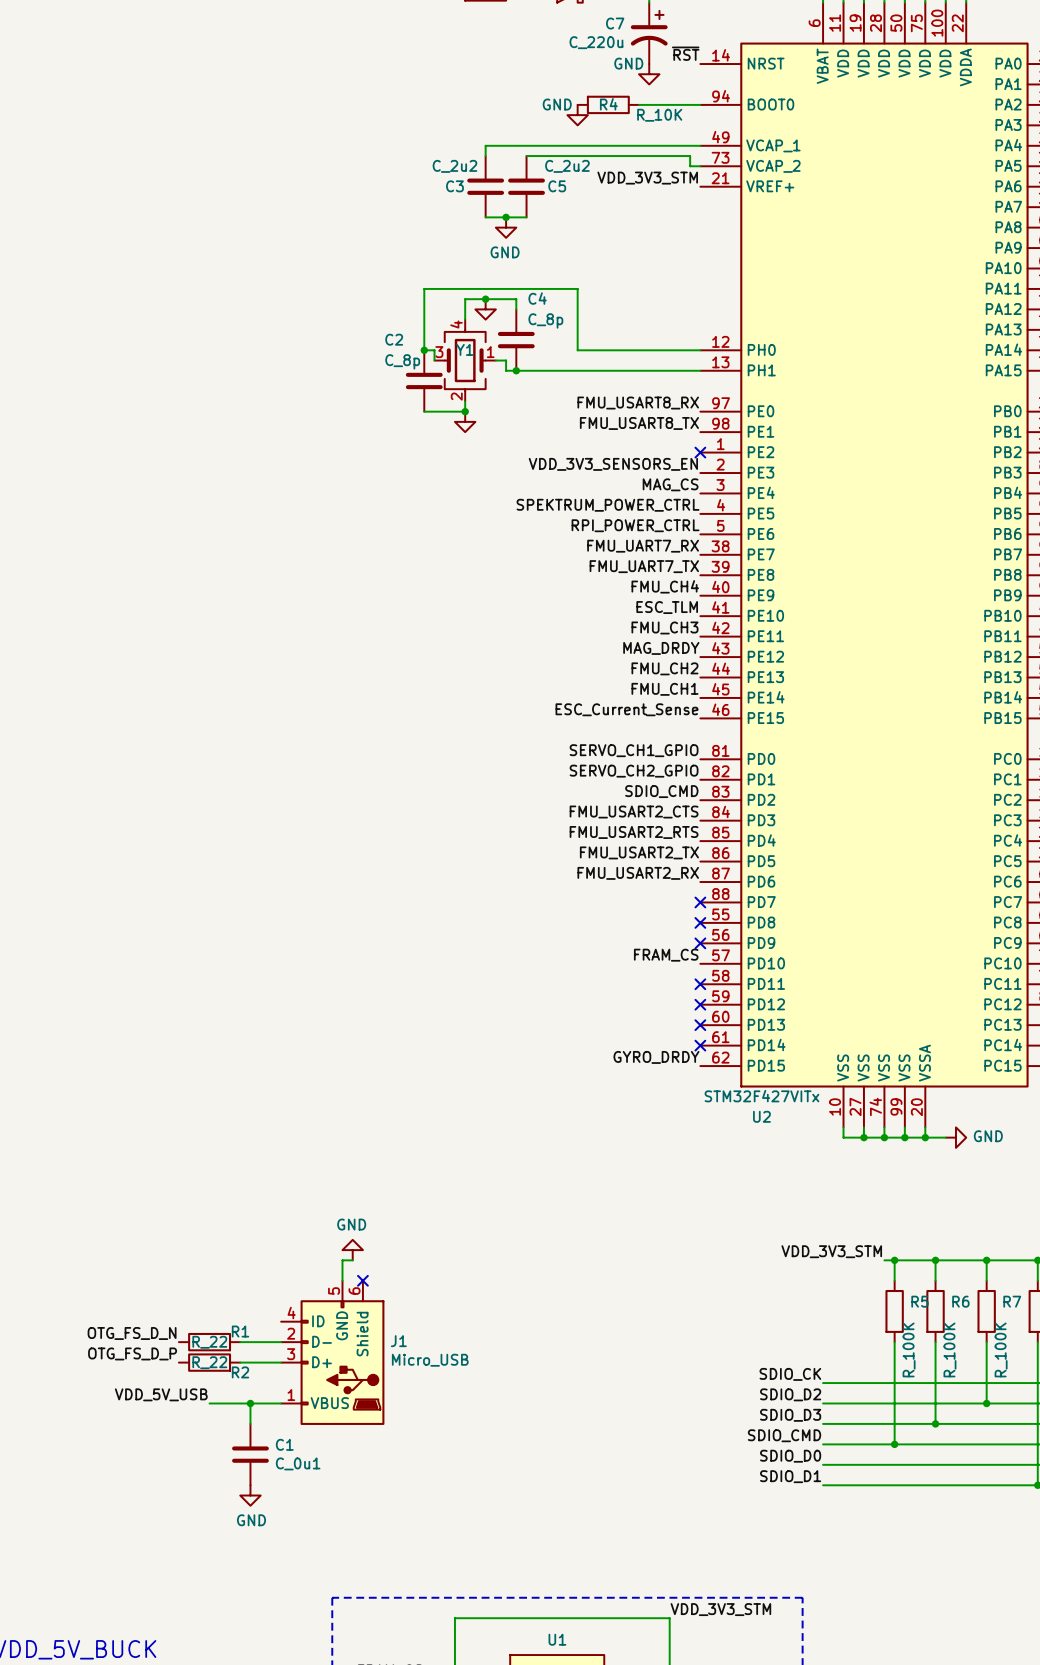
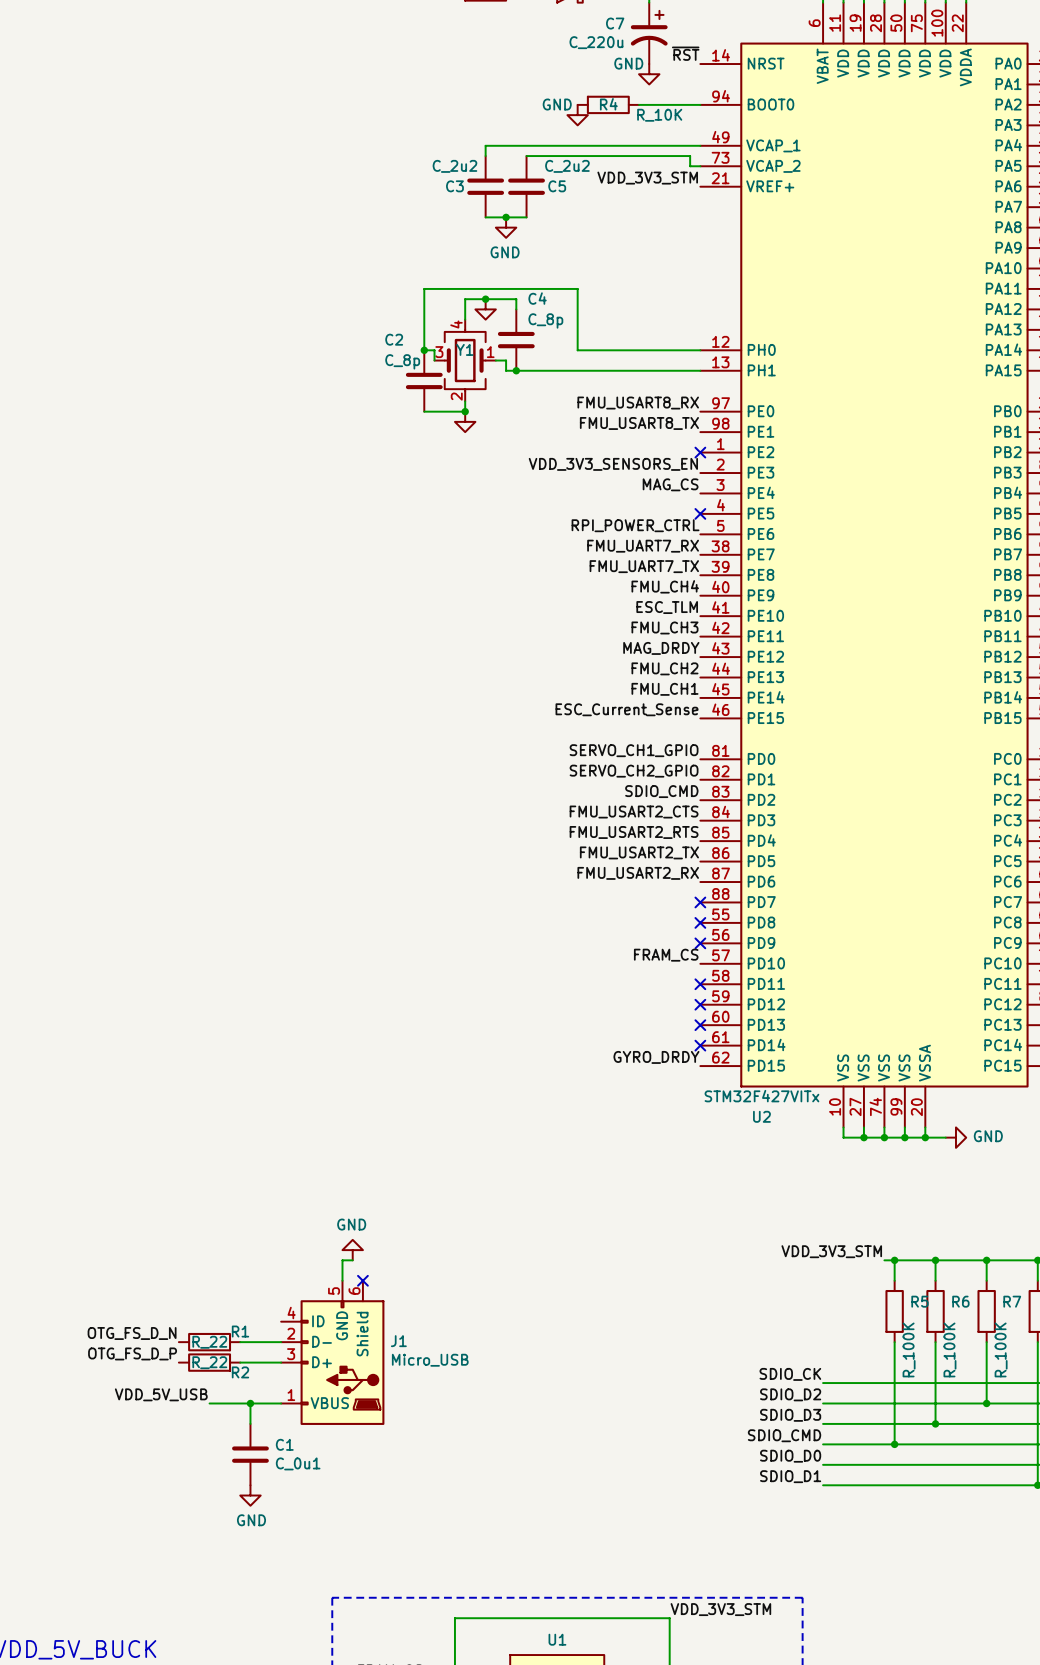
label: SPEKTRUM_POWER_CTRL (608, 505) -> none
no-connect mark: none -> (700, 513)

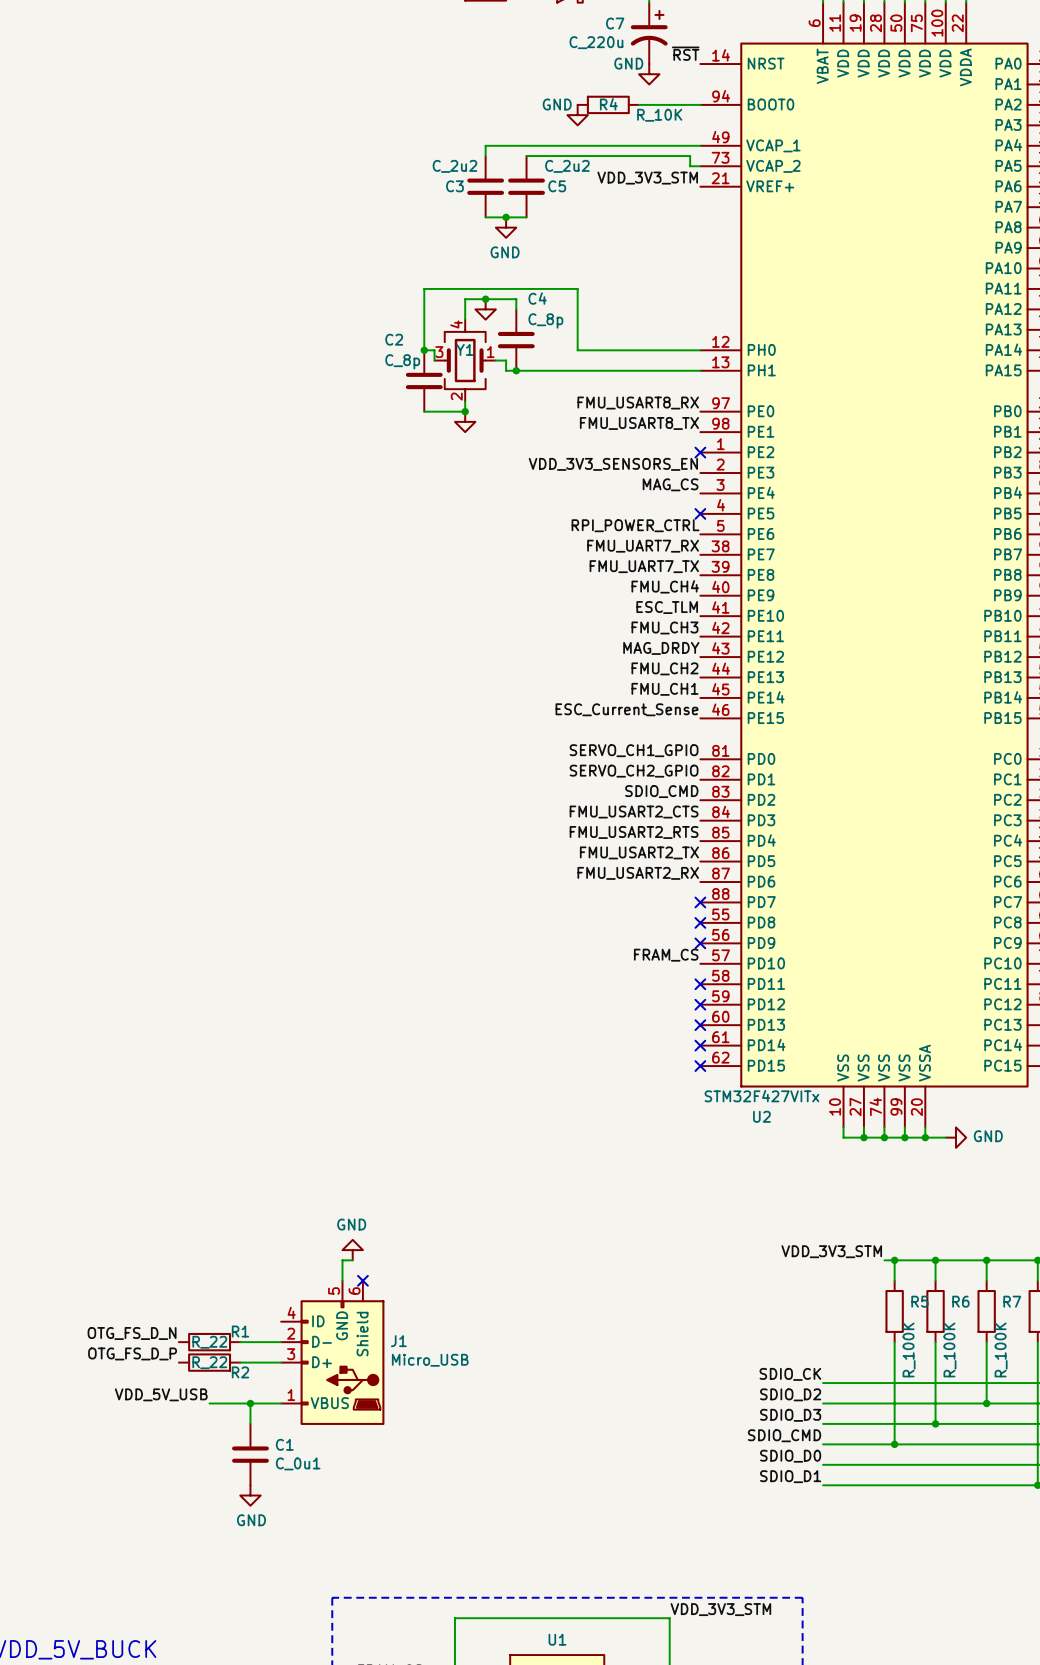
label: GYRO_DRDY (656, 1057) -> none
no-connect mark: none -> (700, 1066)

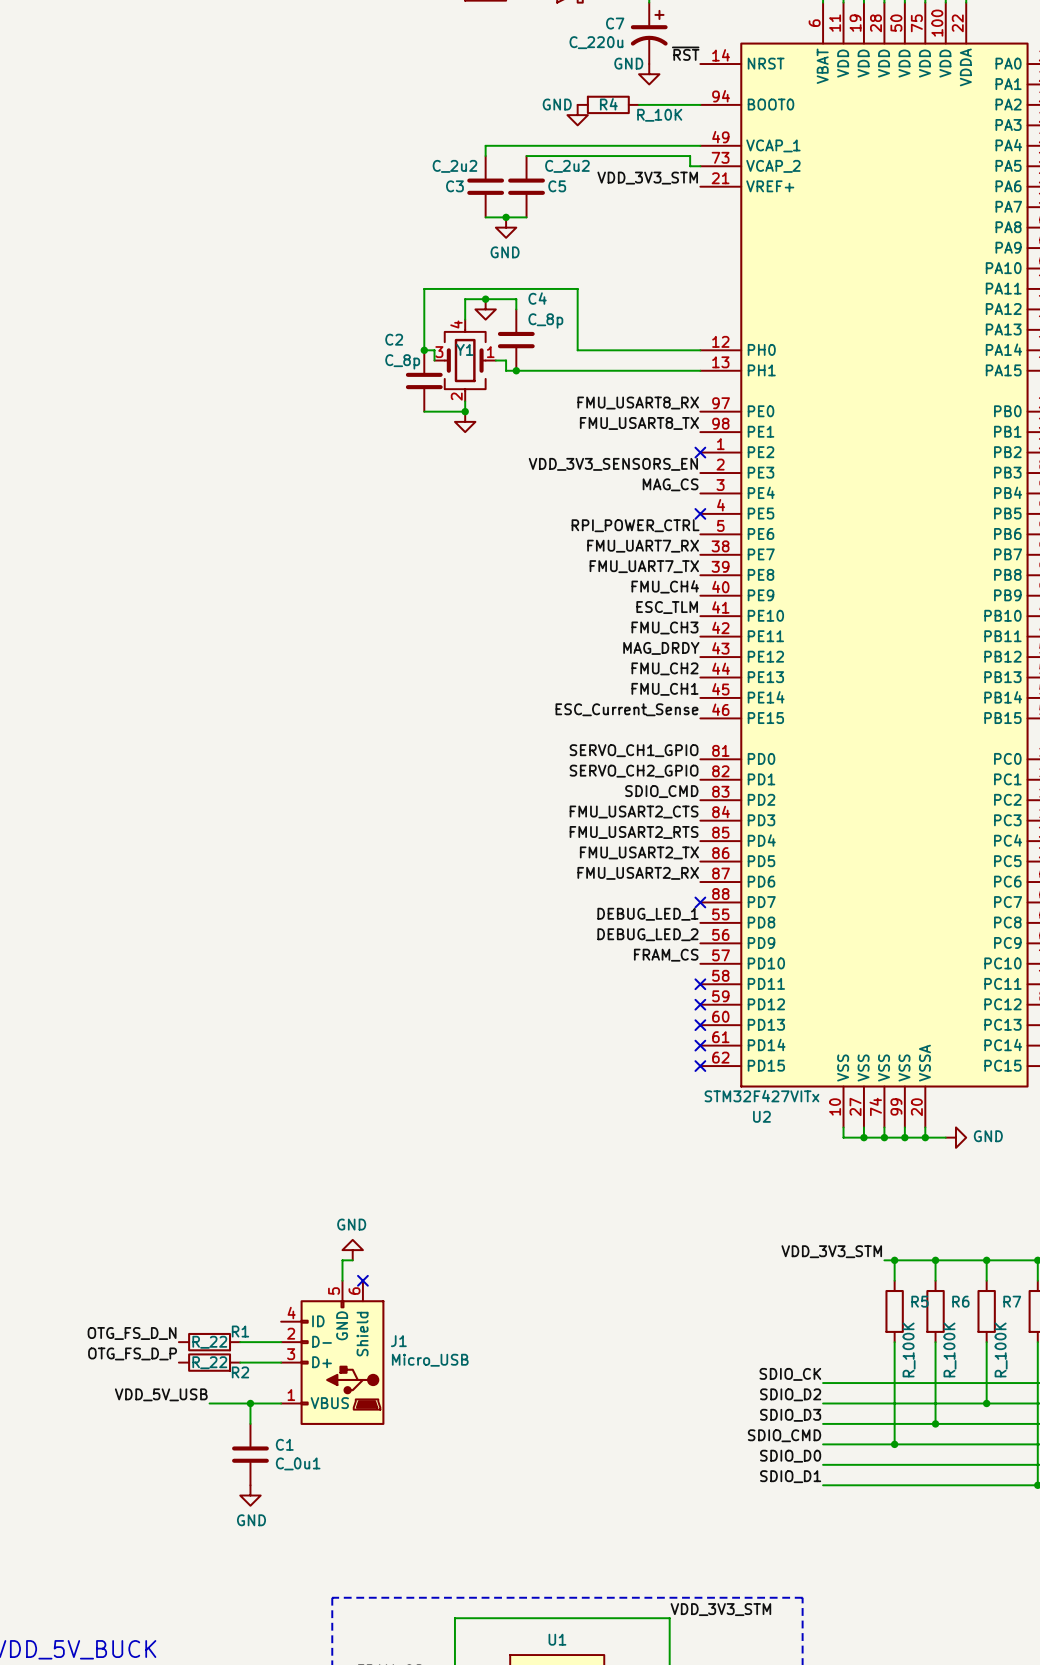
label: none -> DEBUG_LED_1 (647, 914)
no-connect mark: (700, 922) -> none
label: none -> DEBUG_LED_2 (647, 934)
no-connect mark: (700, 943) -> none

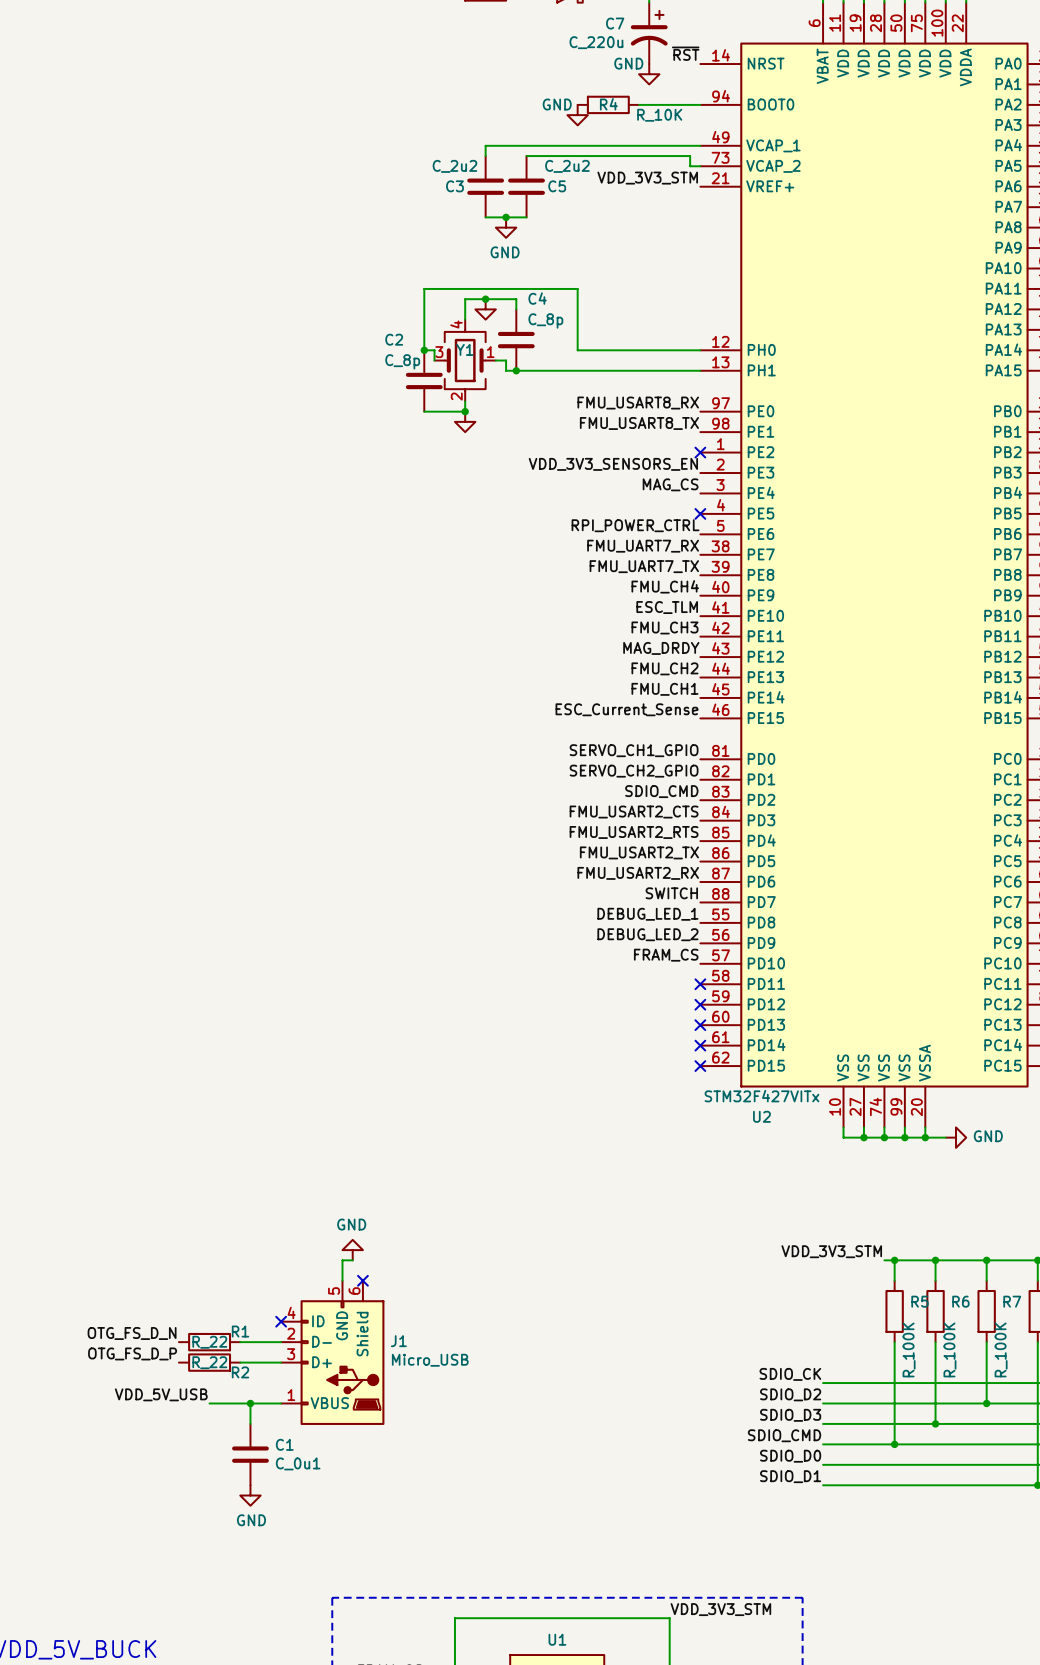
label: none -> SWITCH (671, 893)
no-connect mark: (700, 902) -> none
no-connect mark: none -> (281, 1321)

